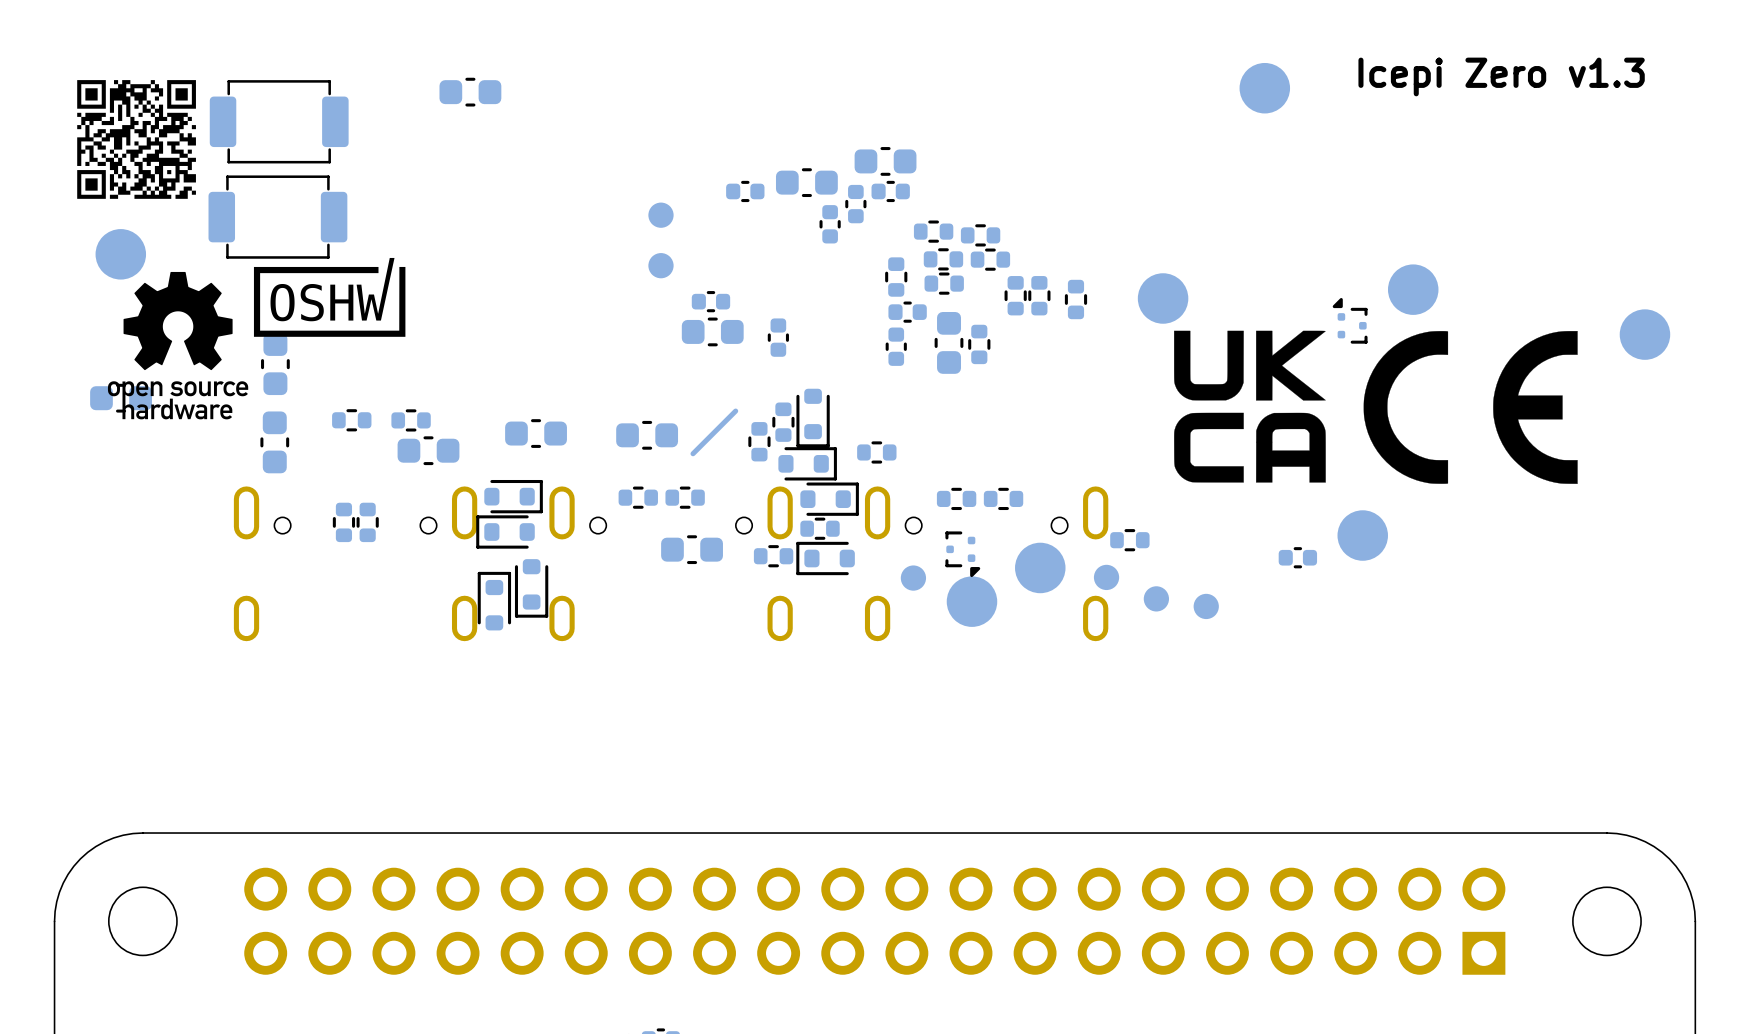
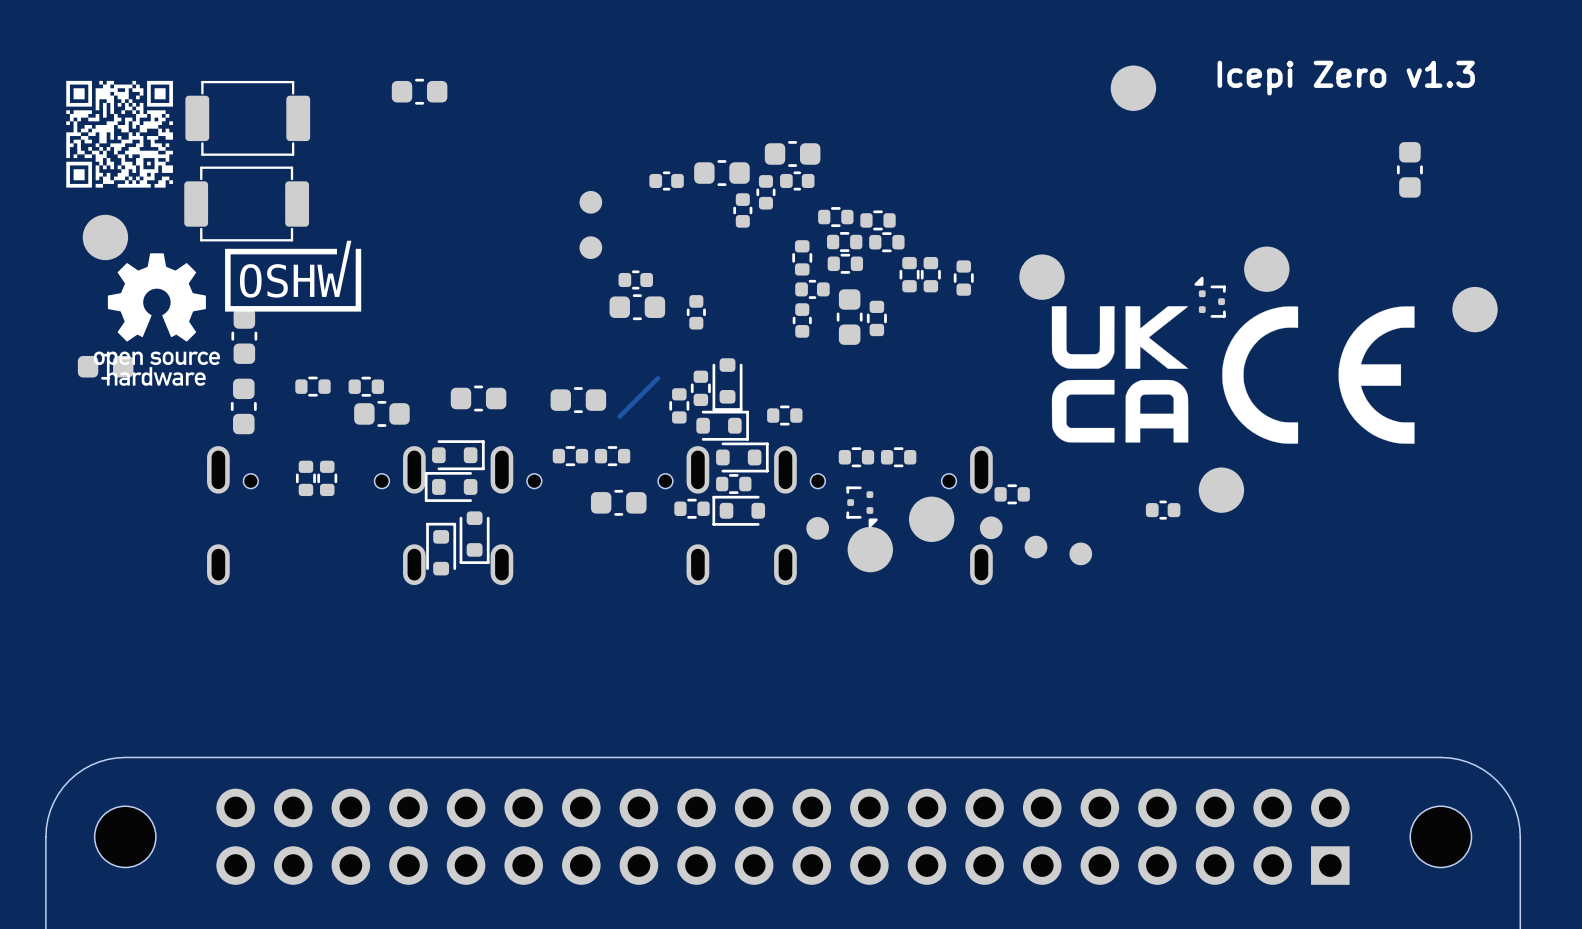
part: none -> (1409, 169)

